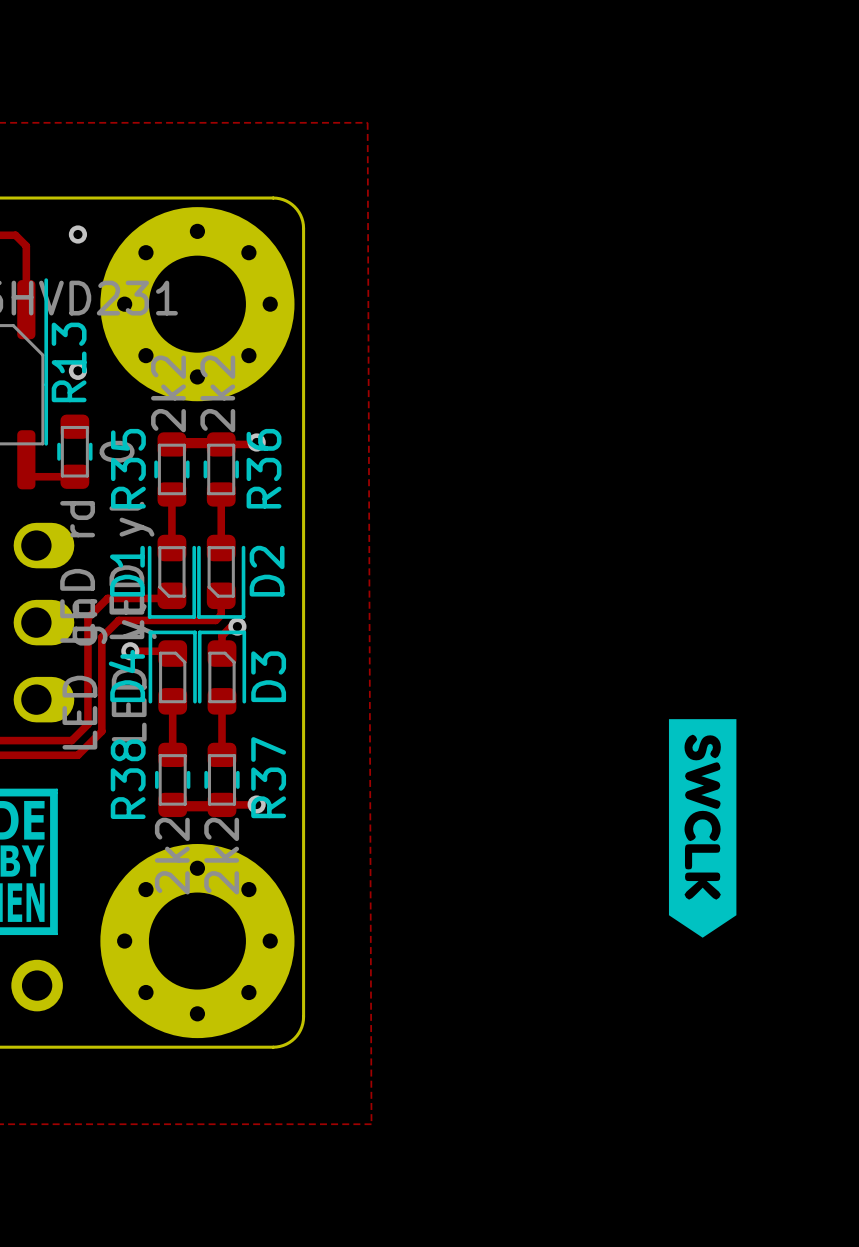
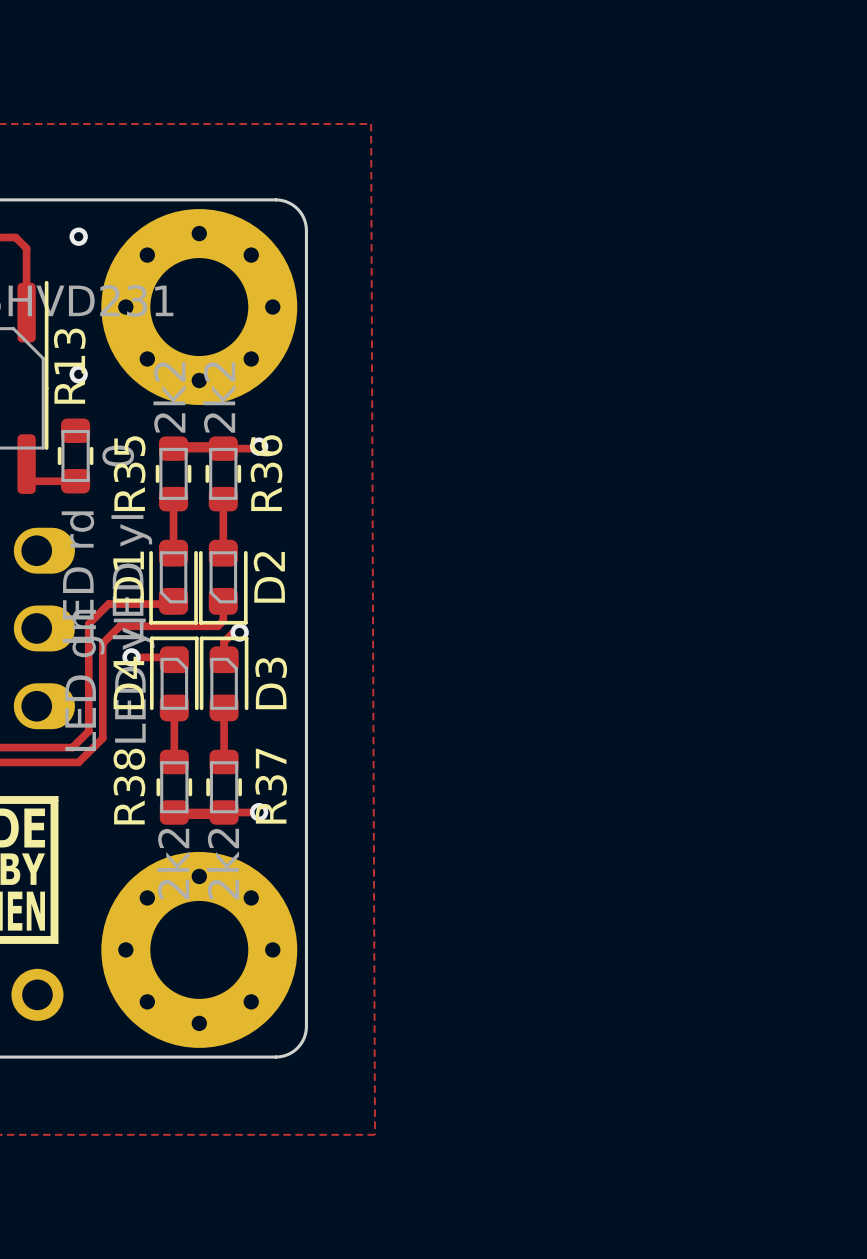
drawing: [668, 719, 737, 938] -> none

